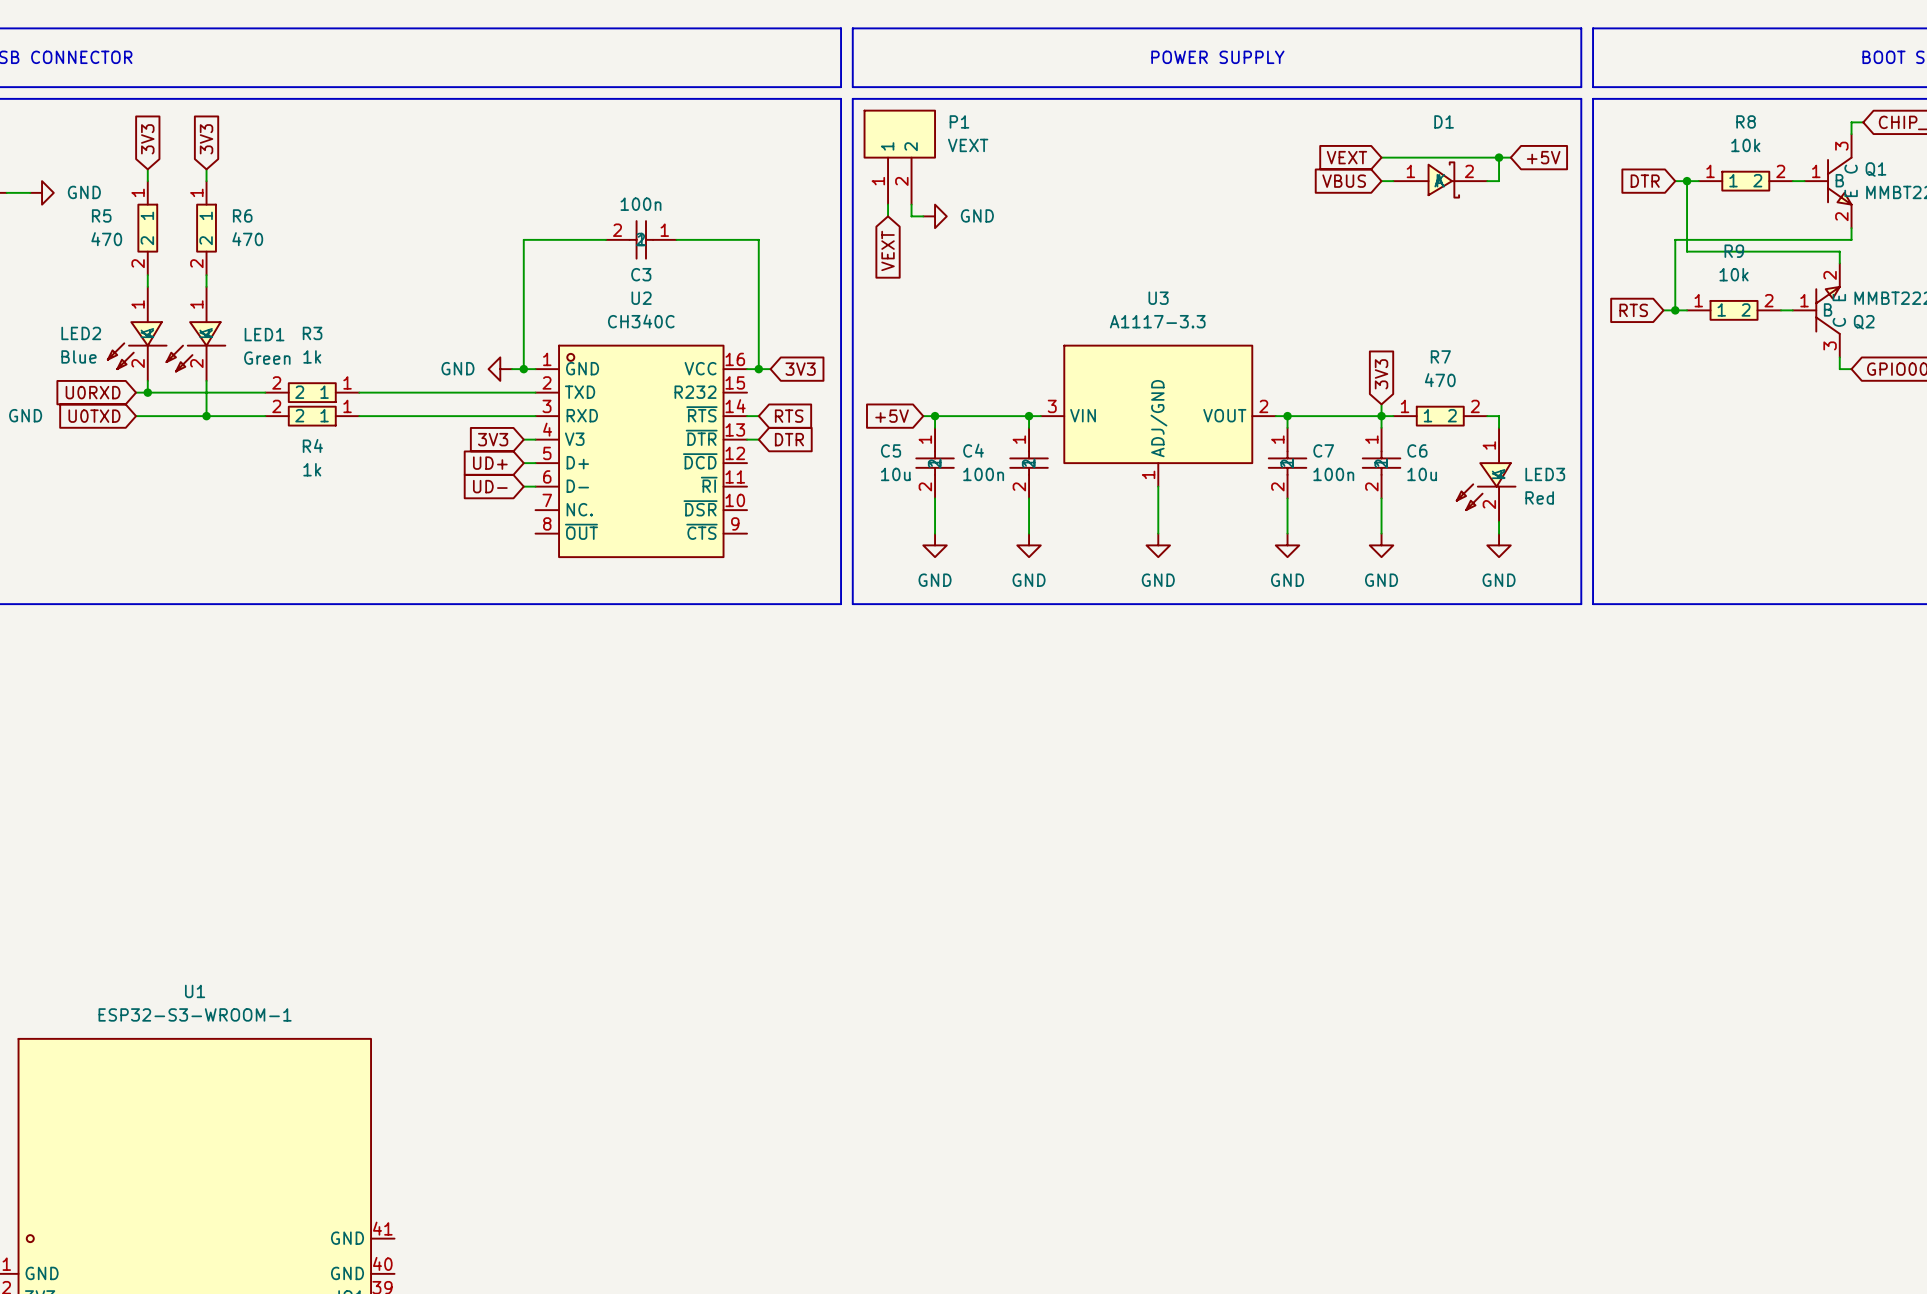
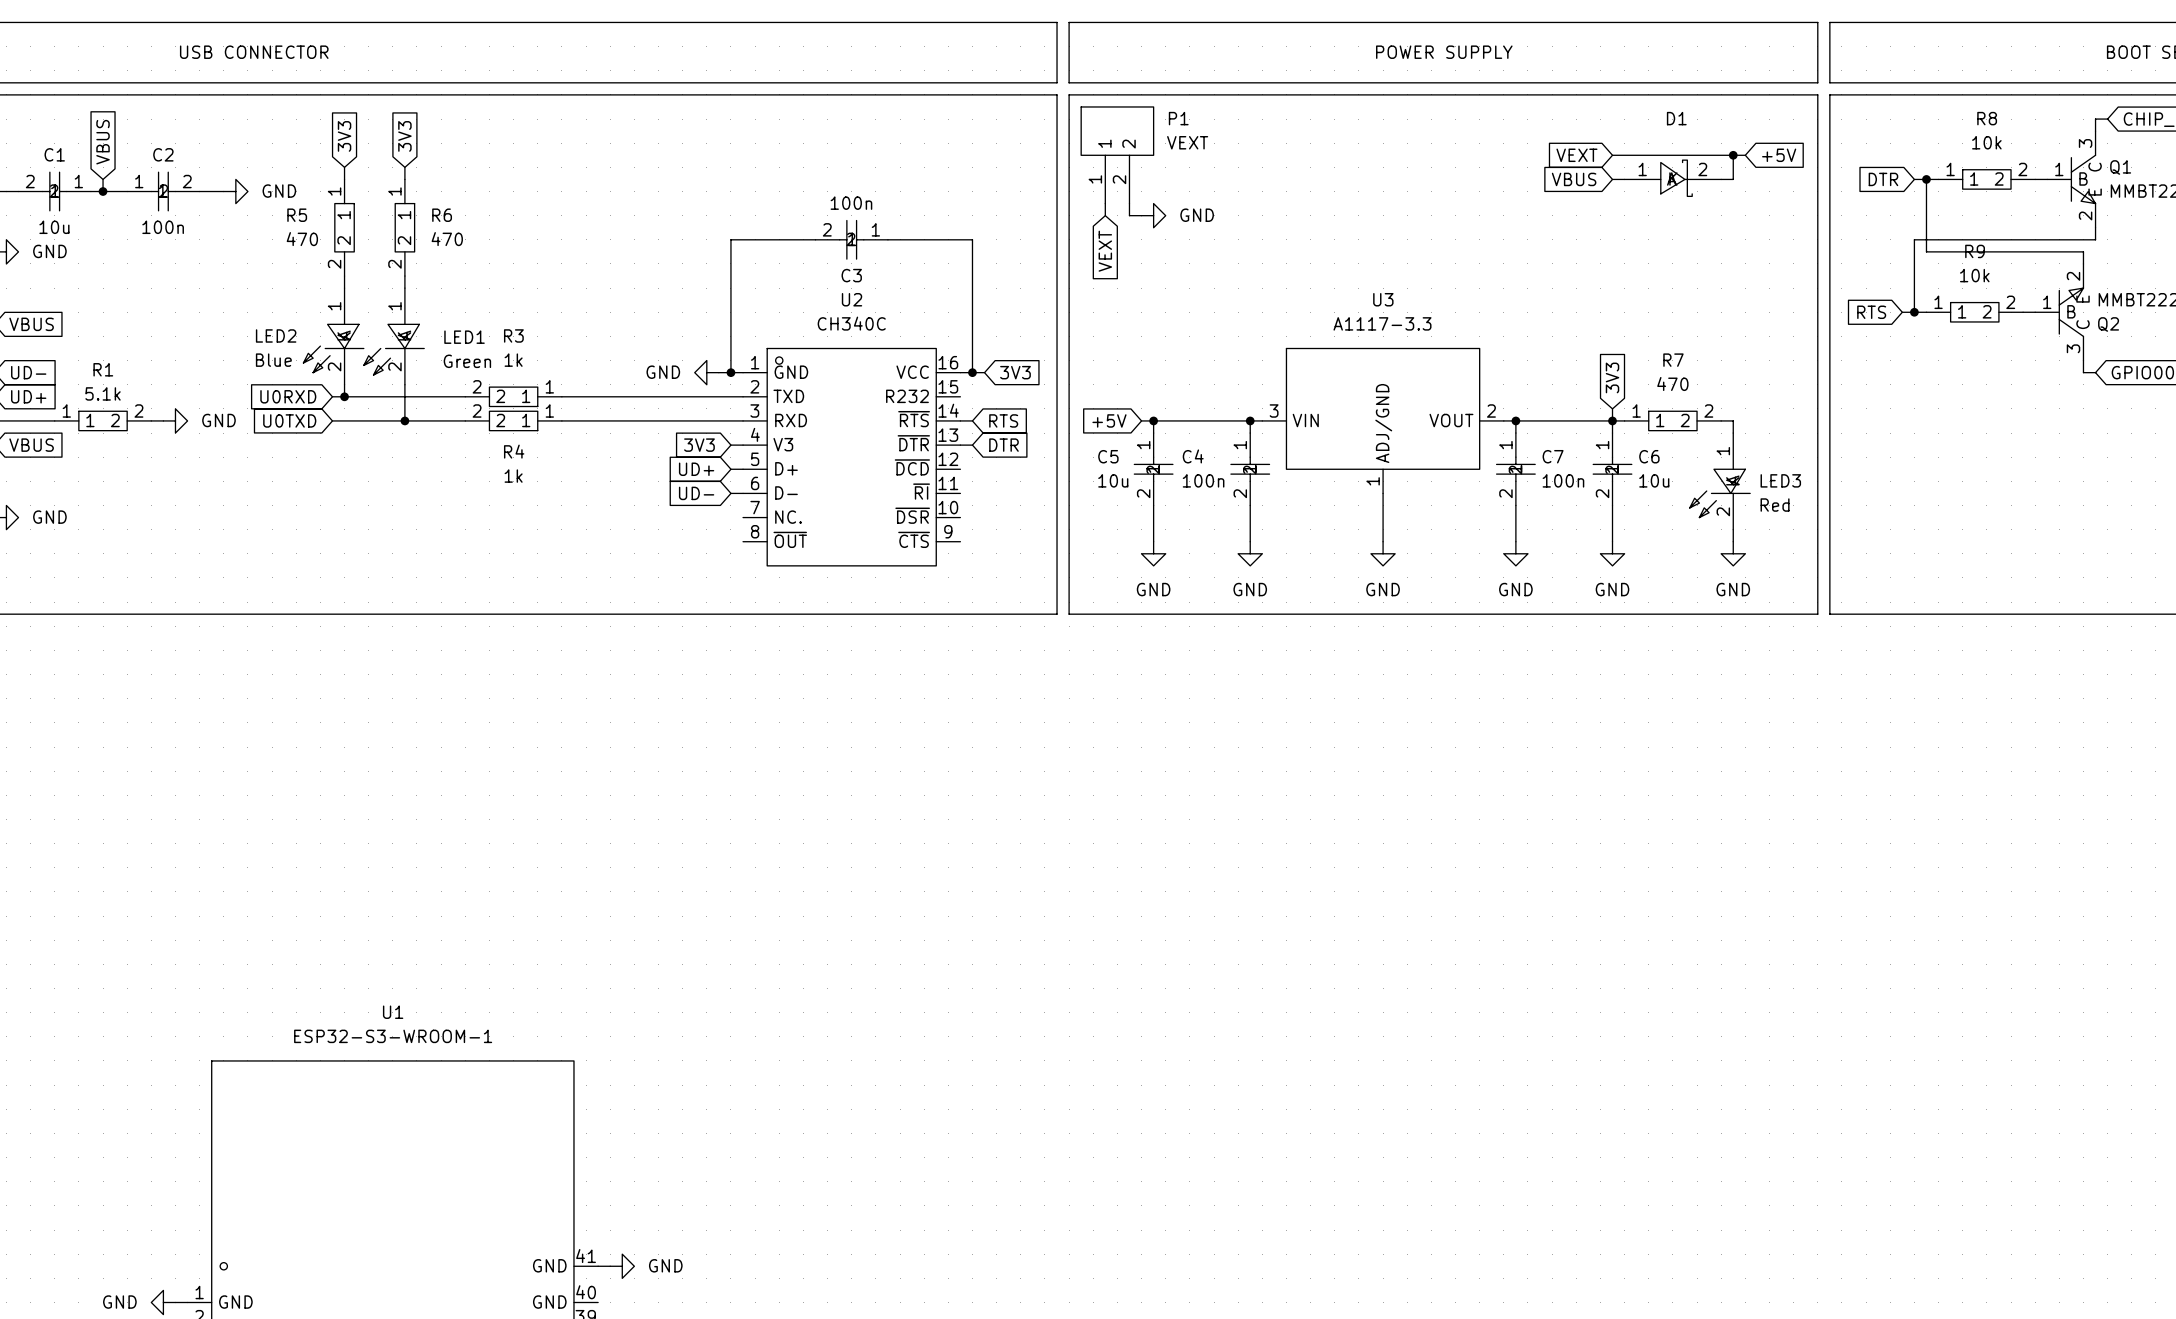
wire: none -> (598, 1266) (610, 1266)
power symbol: none -> GND (622, 1266)

